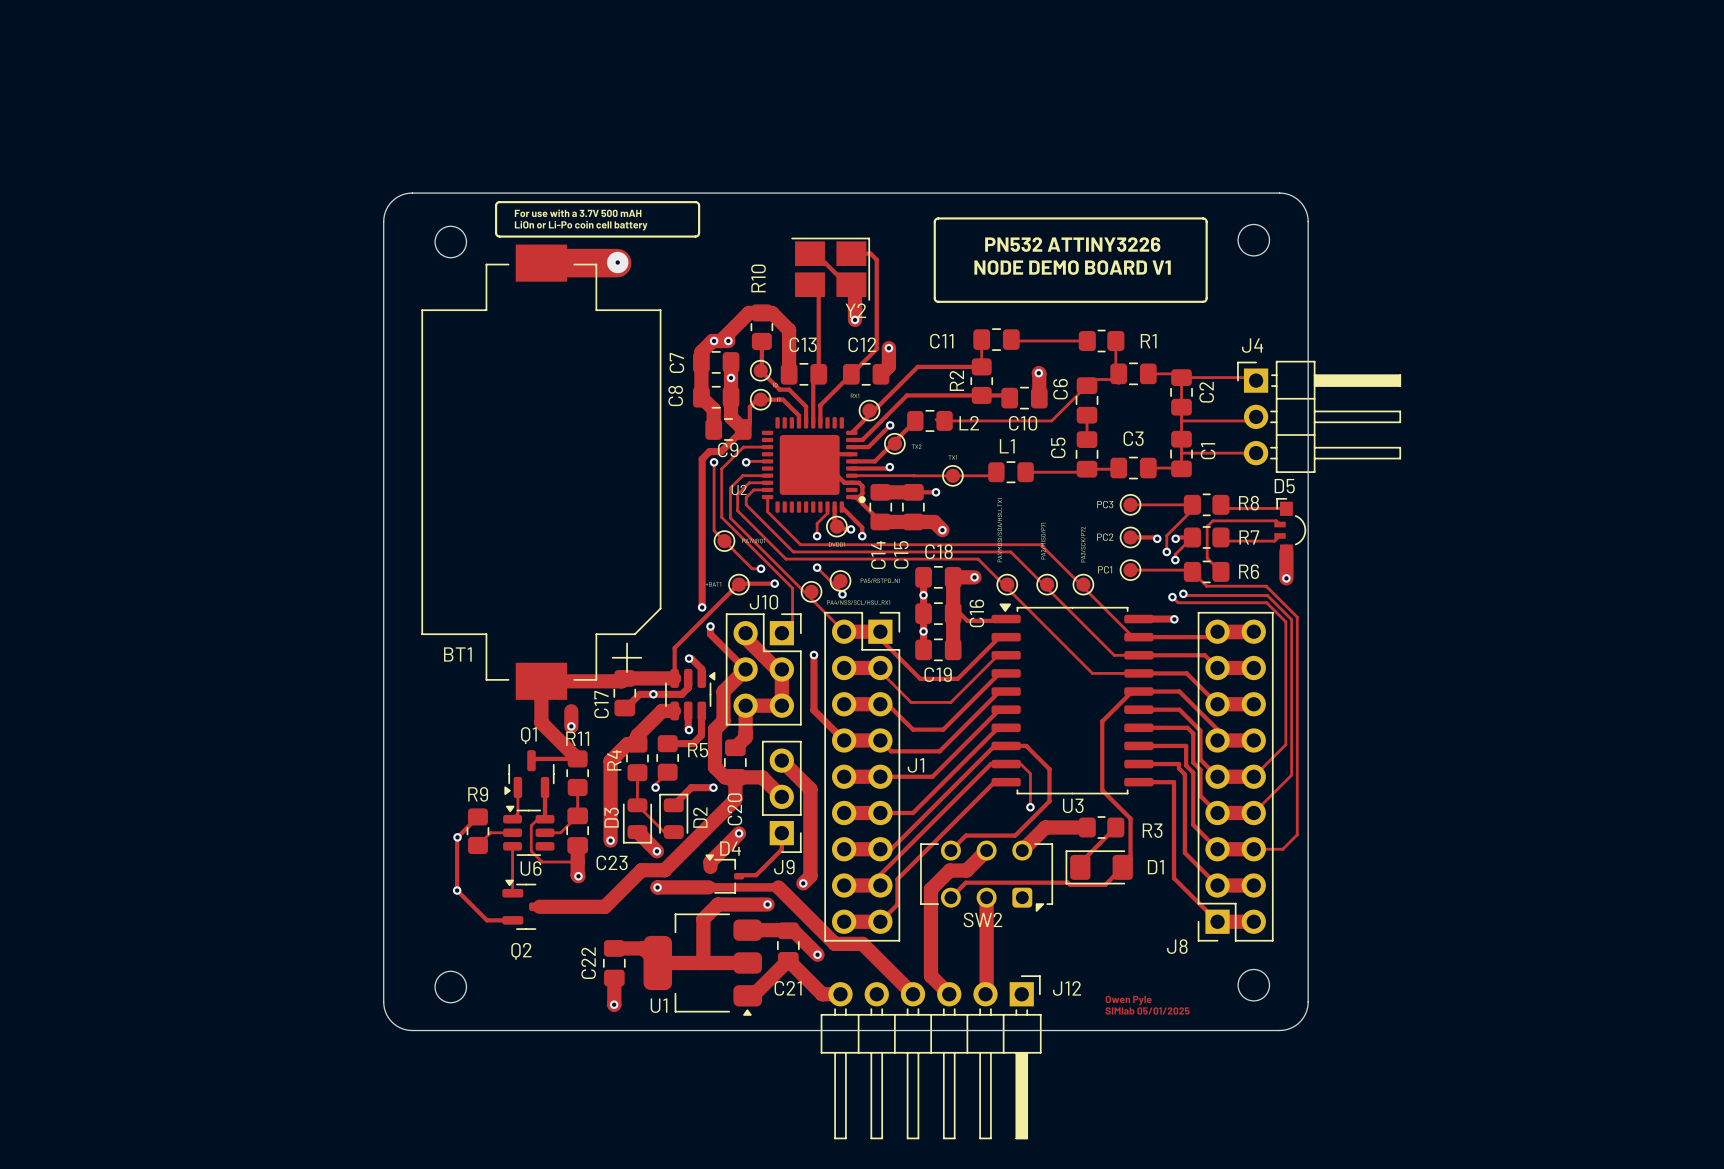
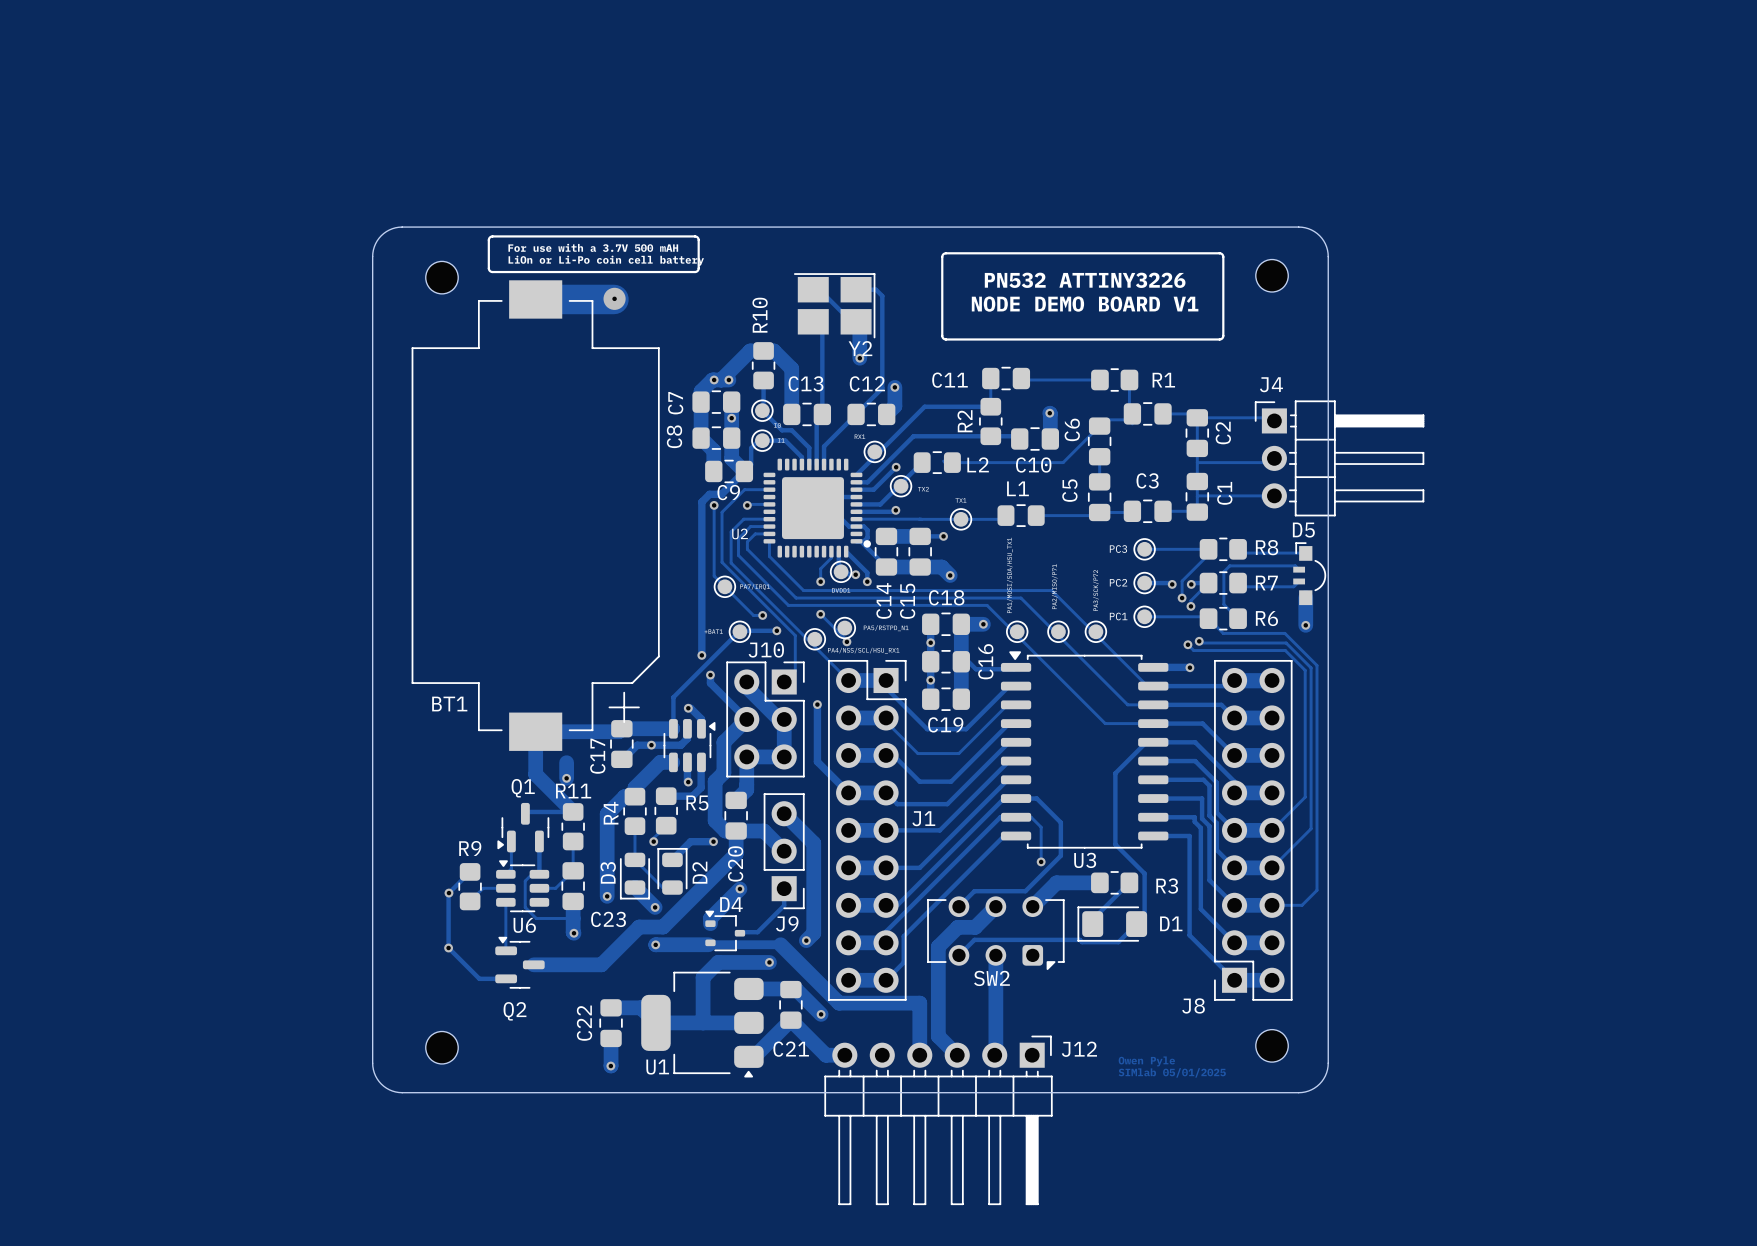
track: (862, 943) (913, 994) -> (867, 1003) (919, 1003) (919, 1055)

